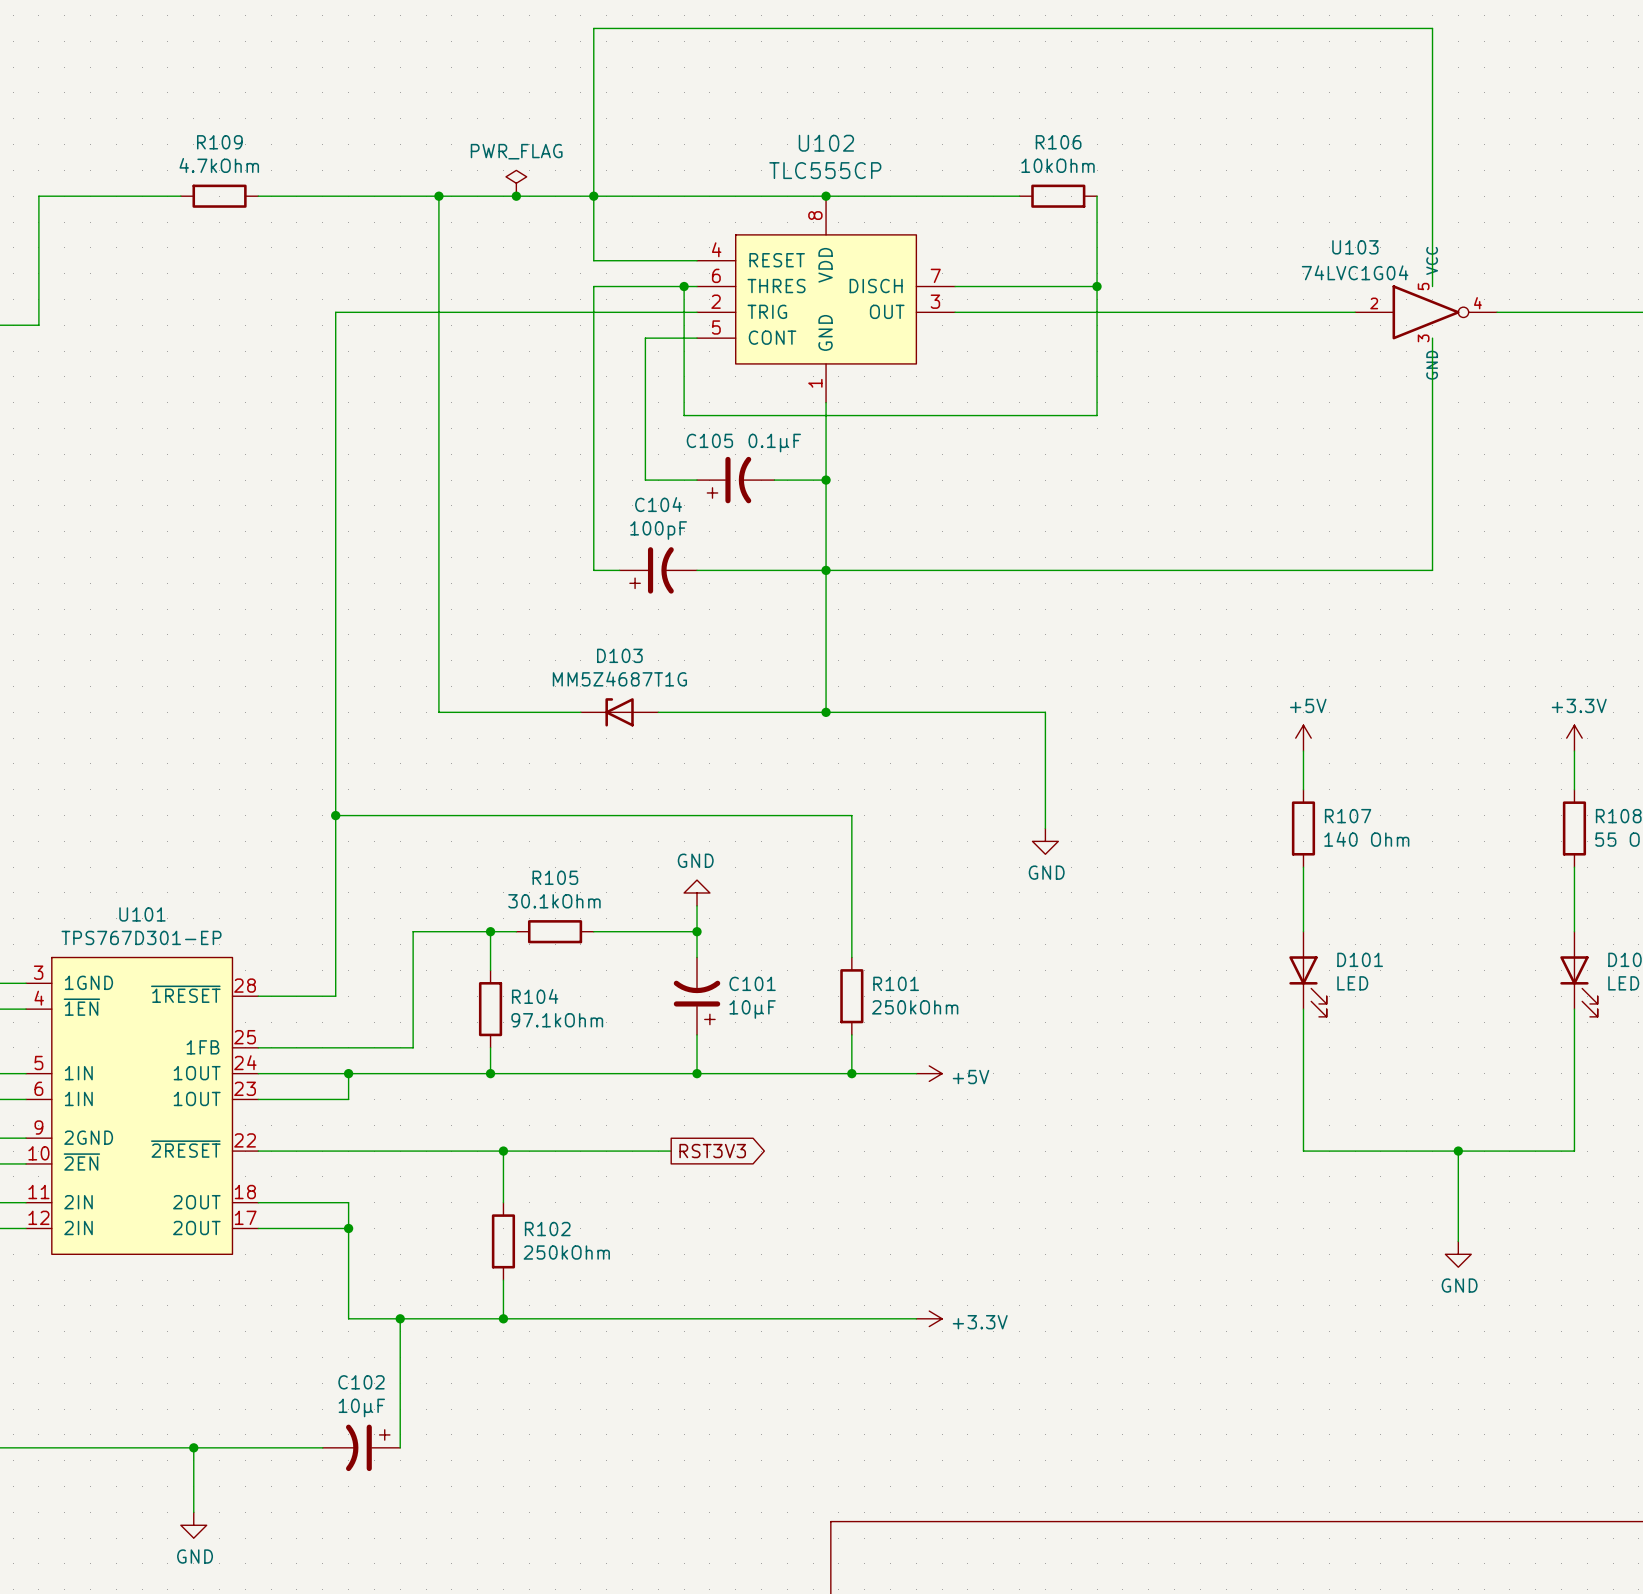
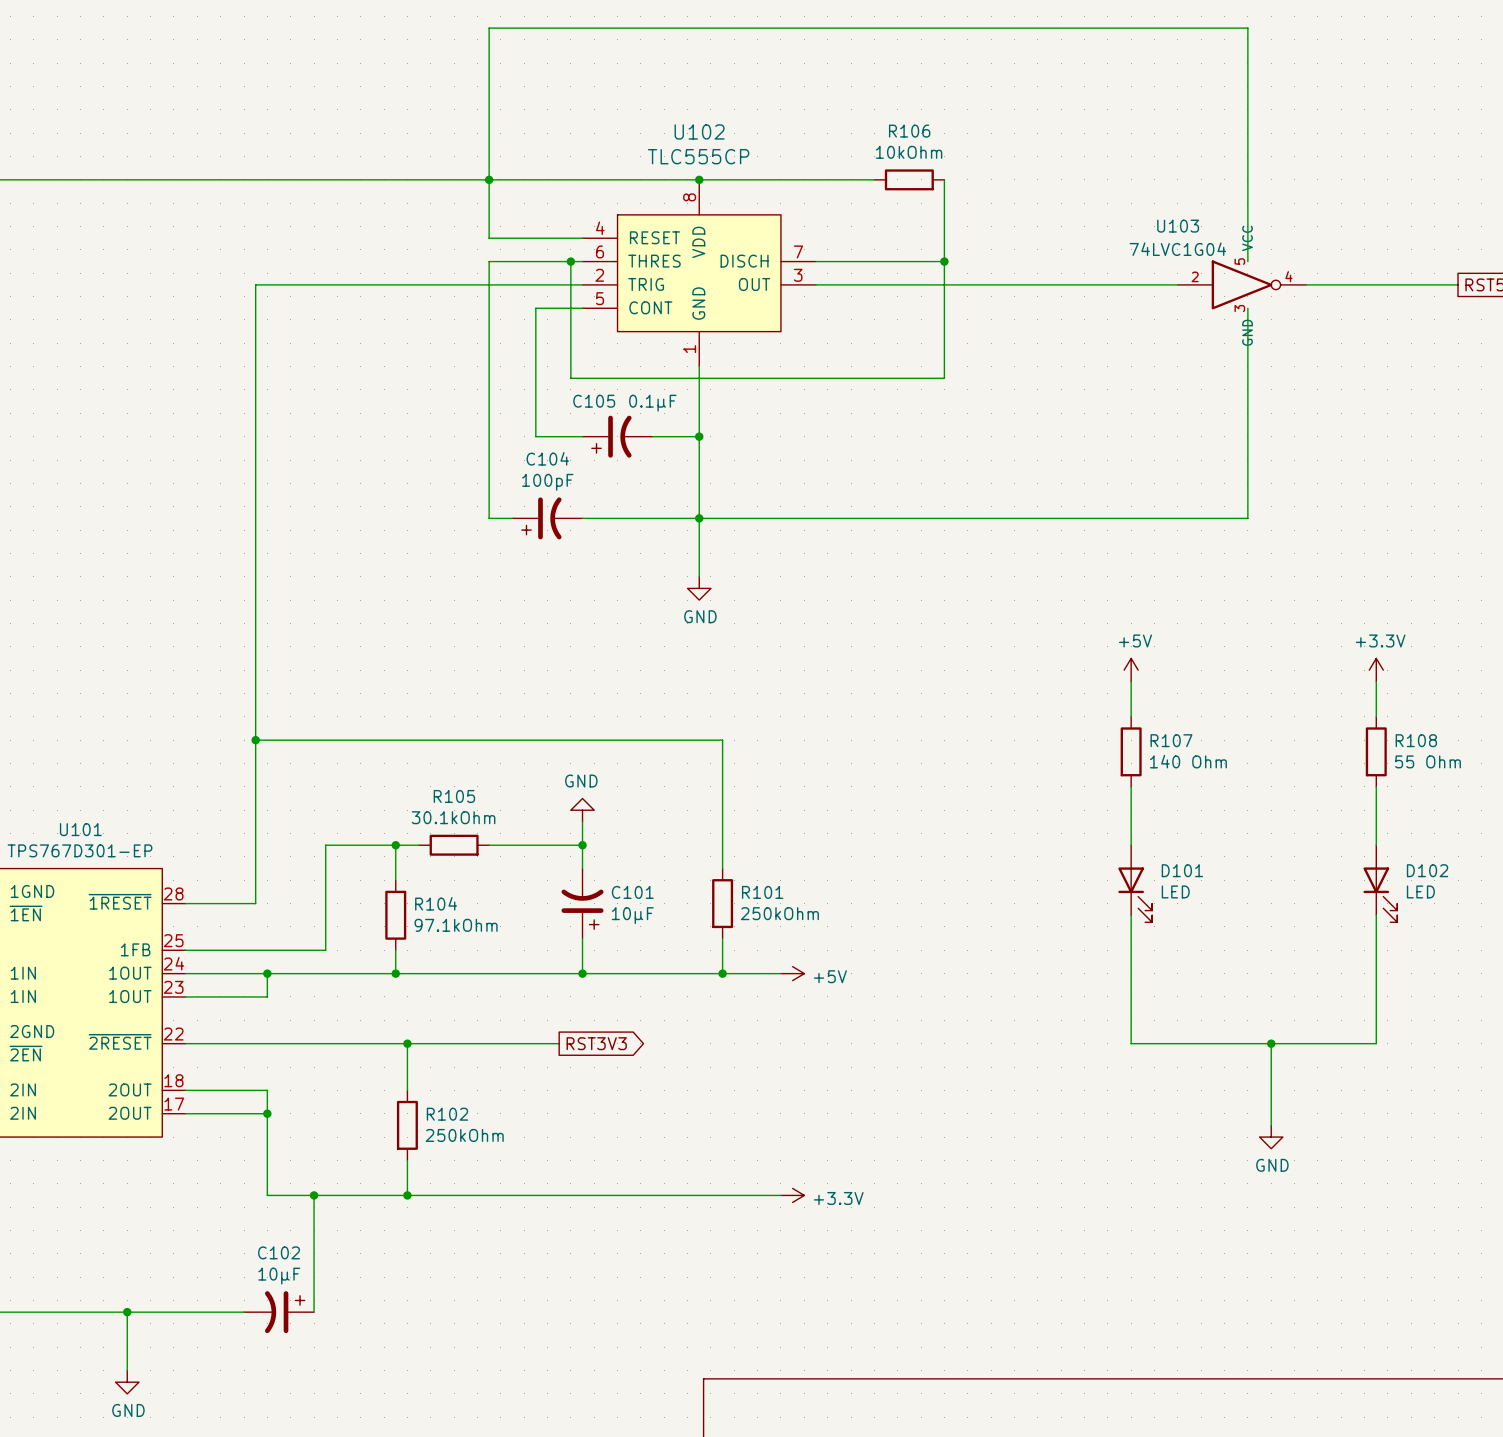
power symbol: PWR_FLAG (516, 183) -> none
wire: none -> (115, 179) (185, 179)
R109: 4.7kOhm (219, 196) -> none
wire: (438, 196) (438, 712) (580, 712) -> none
junction: (438, 196) -> none
junction: (516, 196) -> none
wire: (826, 634) (826, 712) -> none
power symbol: none -> GND (699, 588)
D103: MM5Z4687T1G (619, 712) -> none
wire: (658, 712) (1045, 712) (1045, 828) -> none
junction: (826, 712) -> none
power symbol: GND (1045, 841) -> none

